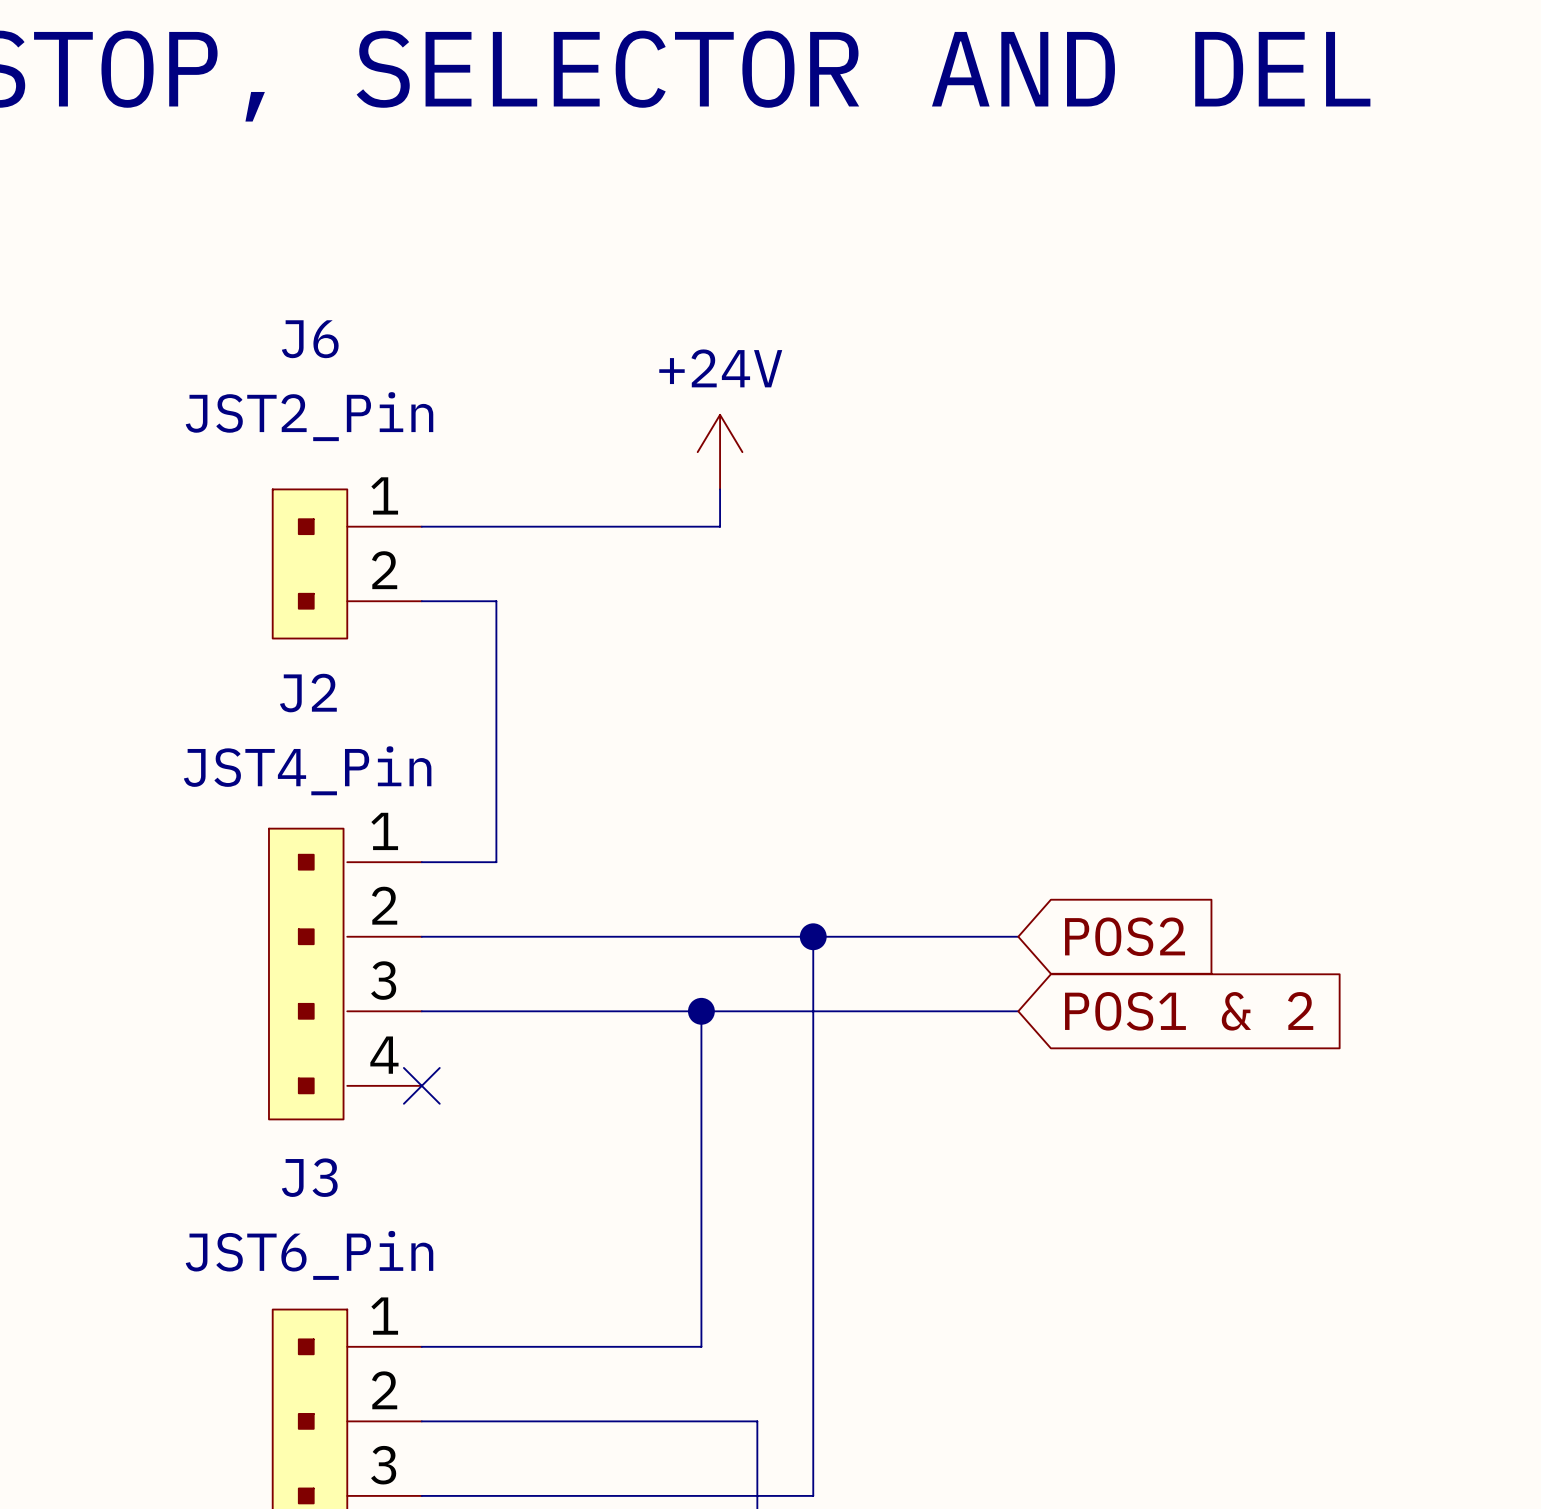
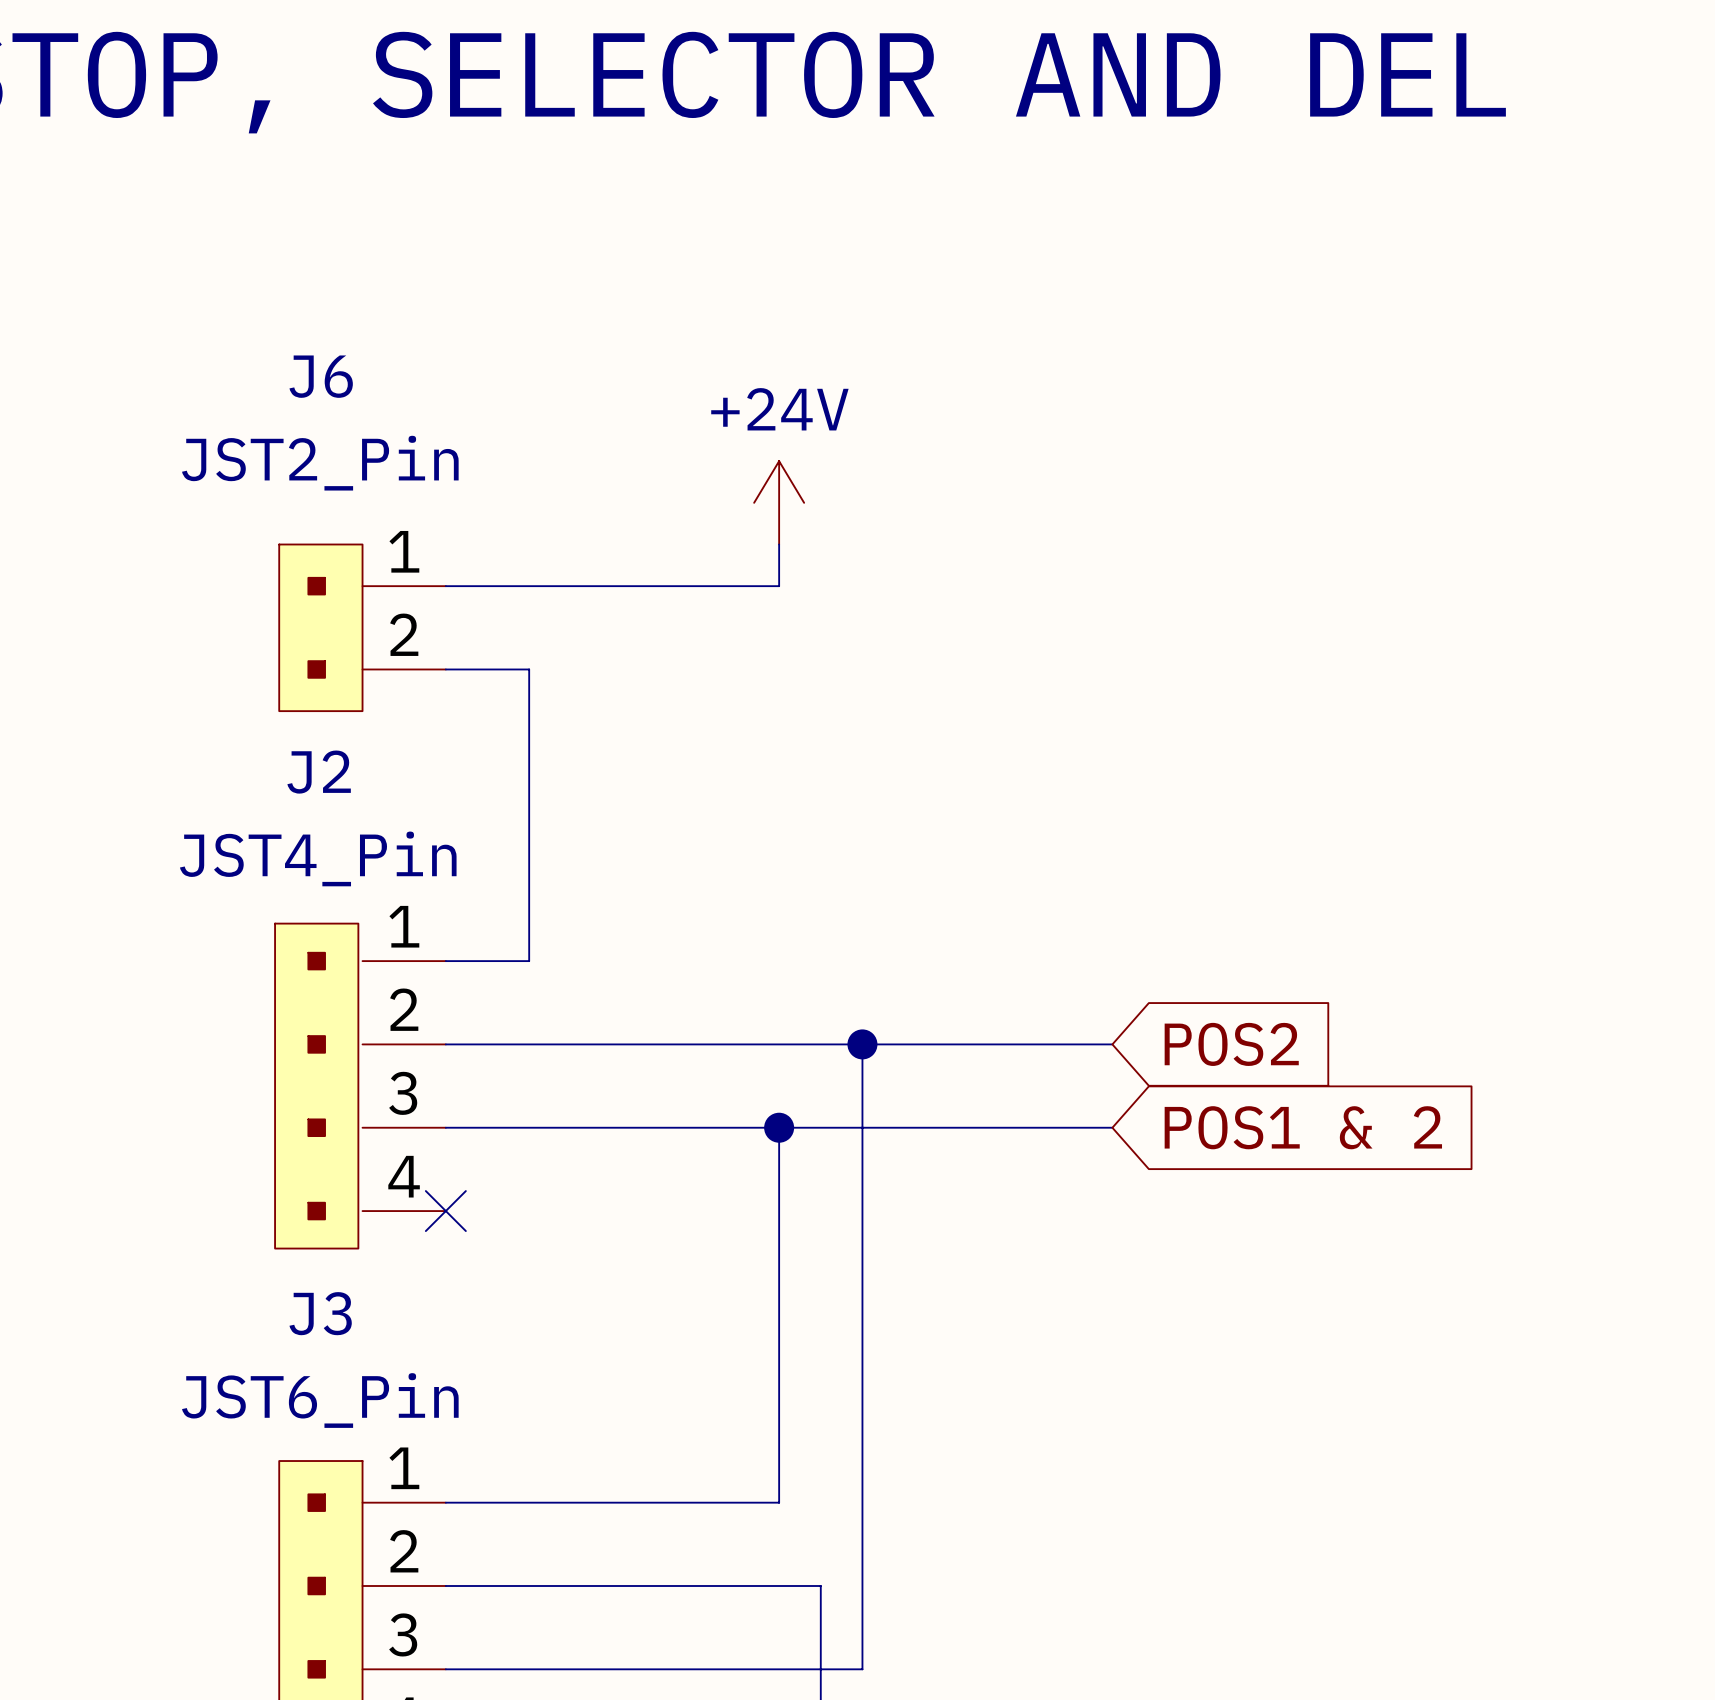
wire: (813, 936) (813, 1495) (794, 1495) -> (862, 1044) (862, 1669)
junction position: (813, 936) -> (862, 1044)
wire: (701, 1011) (701, 1346) -> (779, 1127) (779, 1502) (758, 1502)
junction position: (701, 1011) -> (779, 1127)

